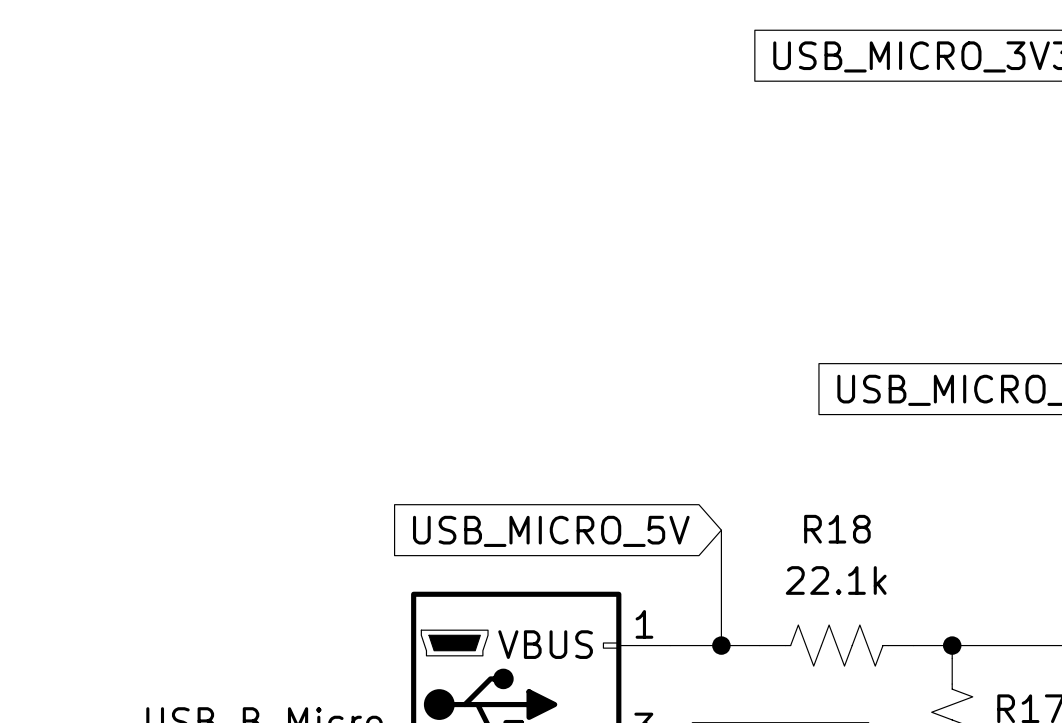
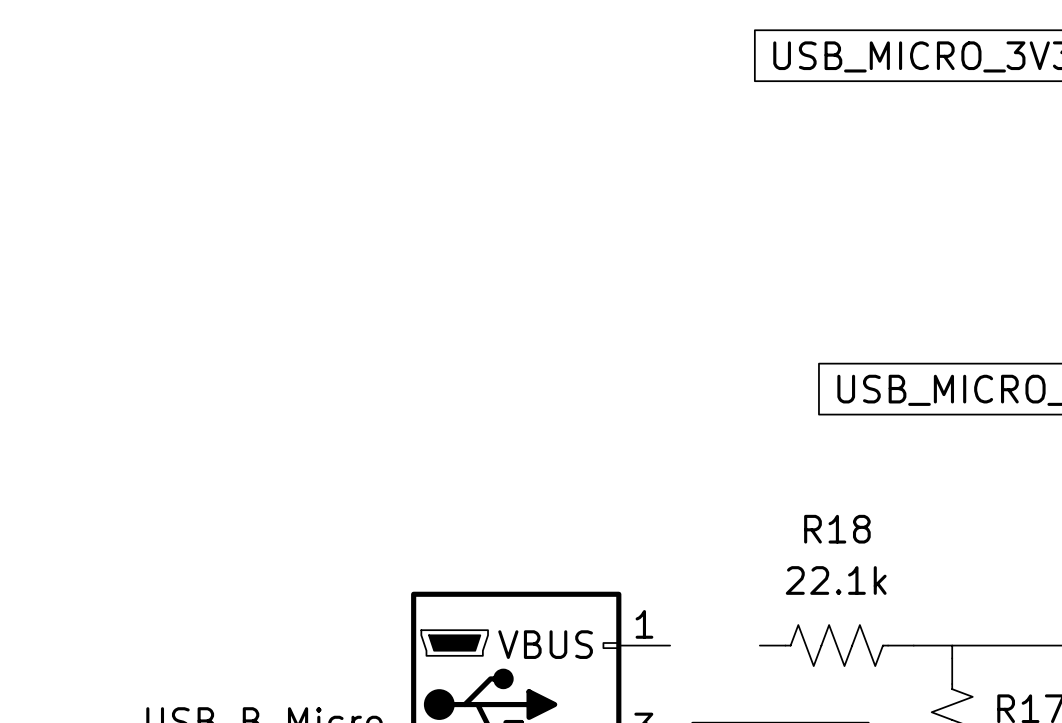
wire: (721, 530) (721, 645) -> none
global label: USB_MICRO_5V (551, 531) -> none
wire: (670, 645) (759, 645) -> none
junction: (721, 645) -> none
junction: (952, 645) -> none

